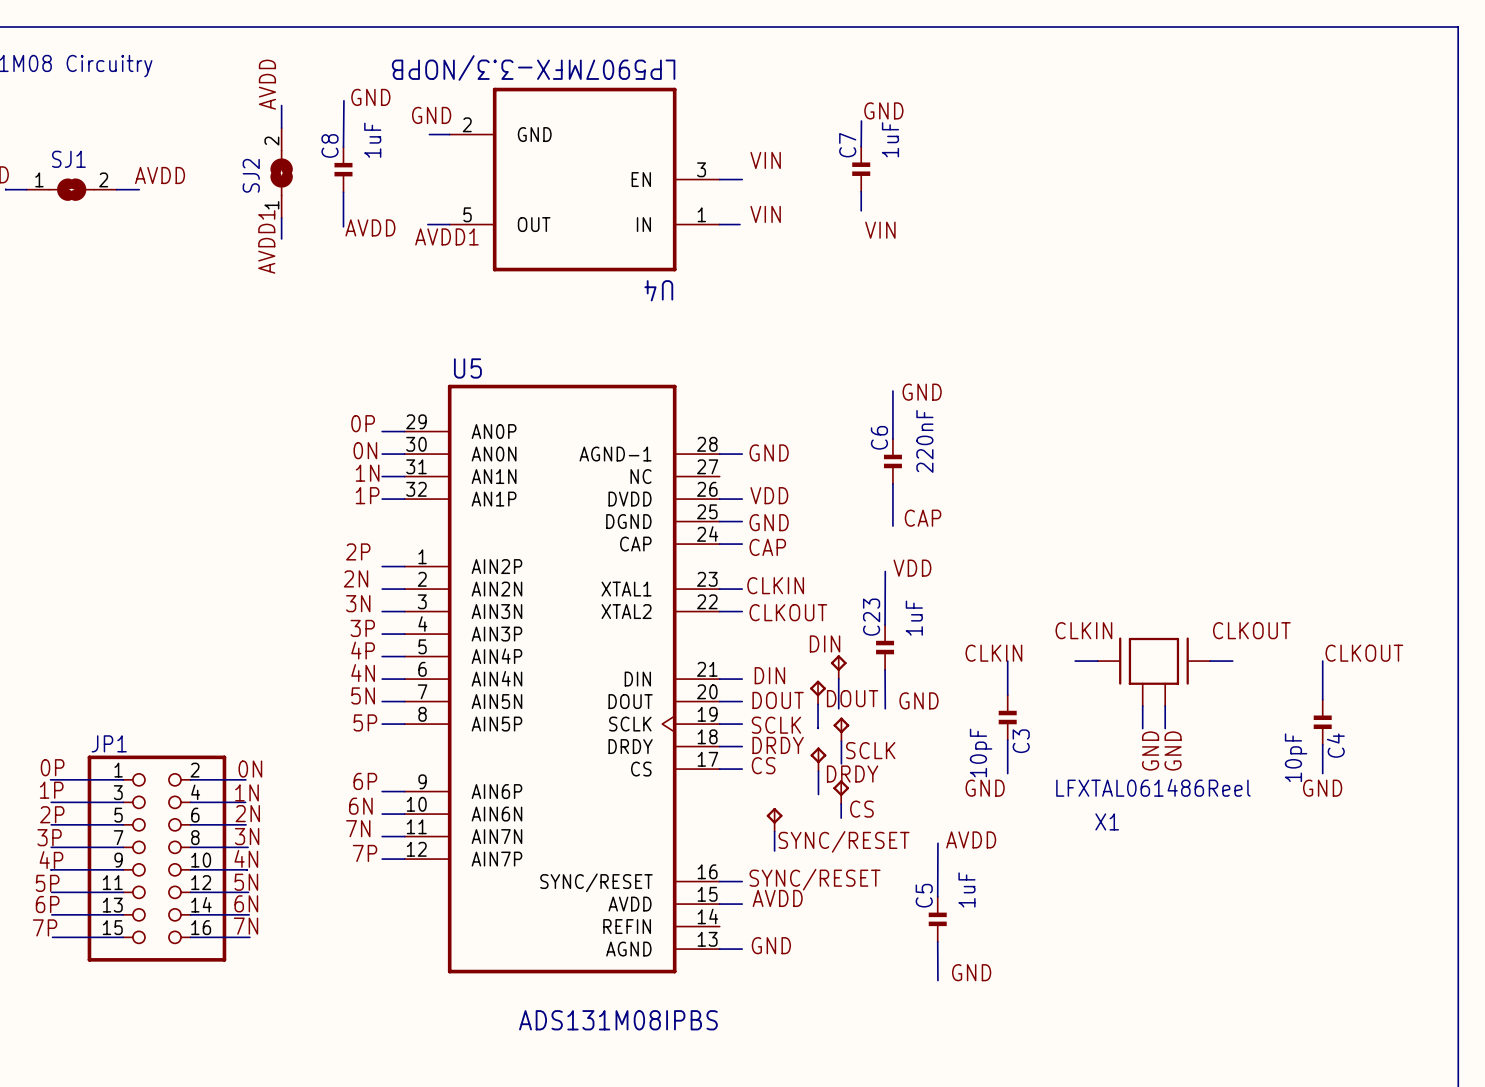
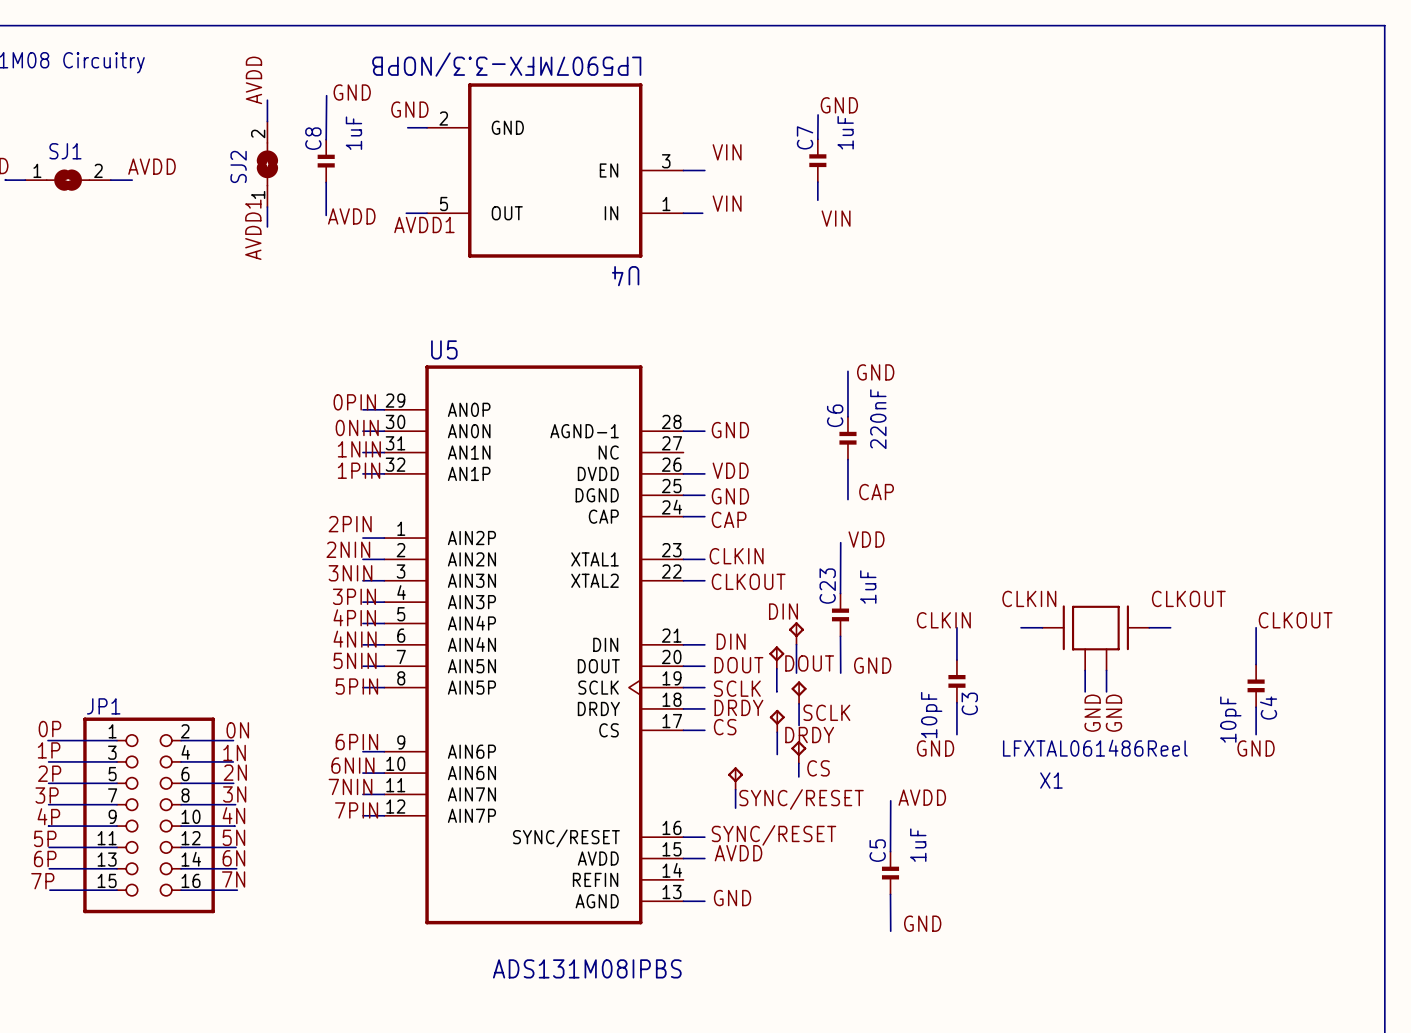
label: 0P (363, 423) -> 0PIN (354, 402)
label: 0N (365, 450) -> 0NIN (357, 427)
label: 1N (367, 473) -> 1NIN (359, 449)
label: 1P (367, 495) -> 1PIN (359, 470)
label: 2P (358, 551) -> 2PIN (350, 524)
label: 2N (356, 578) -> 2NIN (348, 549)
label: 3N (358, 603) -> 3NIN (350, 573)
label: 3P (362, 628) -> 3PIN (354, 596)
label: 4P (363, 650) -> 4PIN (354, 617)
label: 4N (363, 673) -> 4NIN (355, 639)
label: 5N (363, 695) -> 5NIN (355, 660)
label: 5P (365, 722) -> 5PIN (356, 686)
label: 6P (365, 781) -> 6PIN (356, 742)
label: 6N (360, 806) -> 6NIN (352, 765)
label: 7N (358, 828) -> 7NIN (350, 786)
label: 7P (365, 853) -> 7PIN (356, 810)

